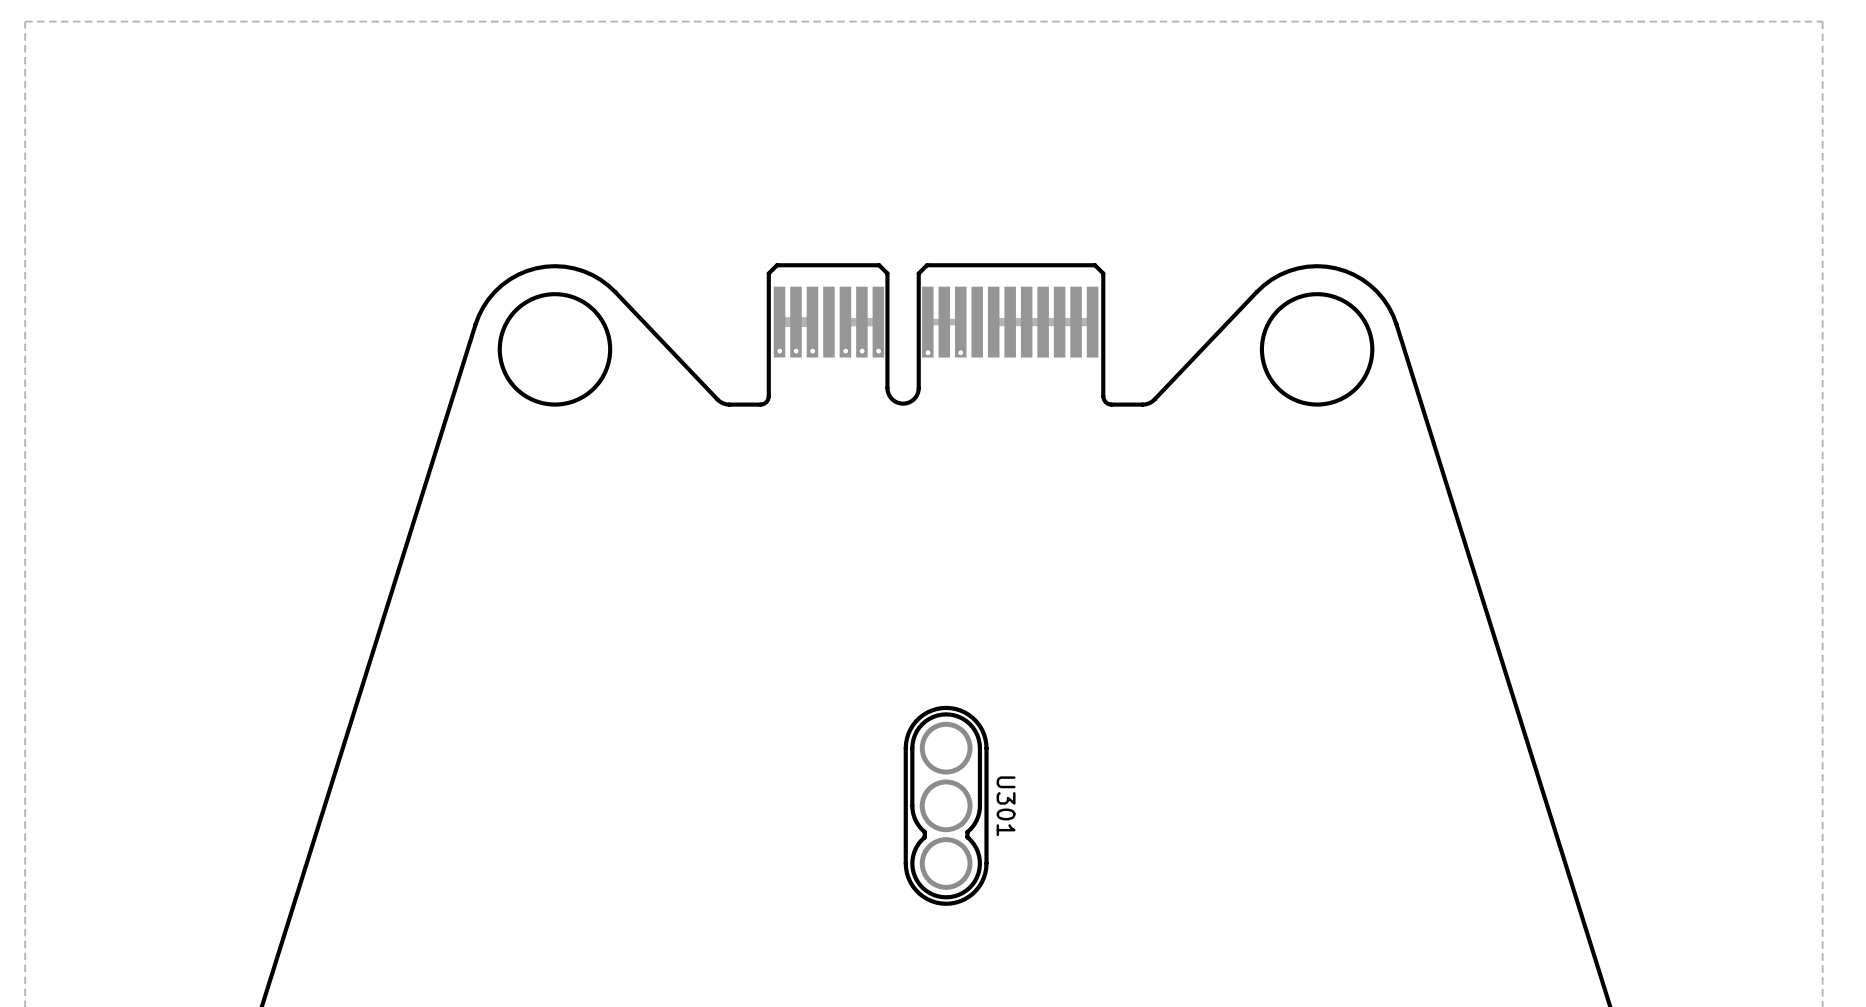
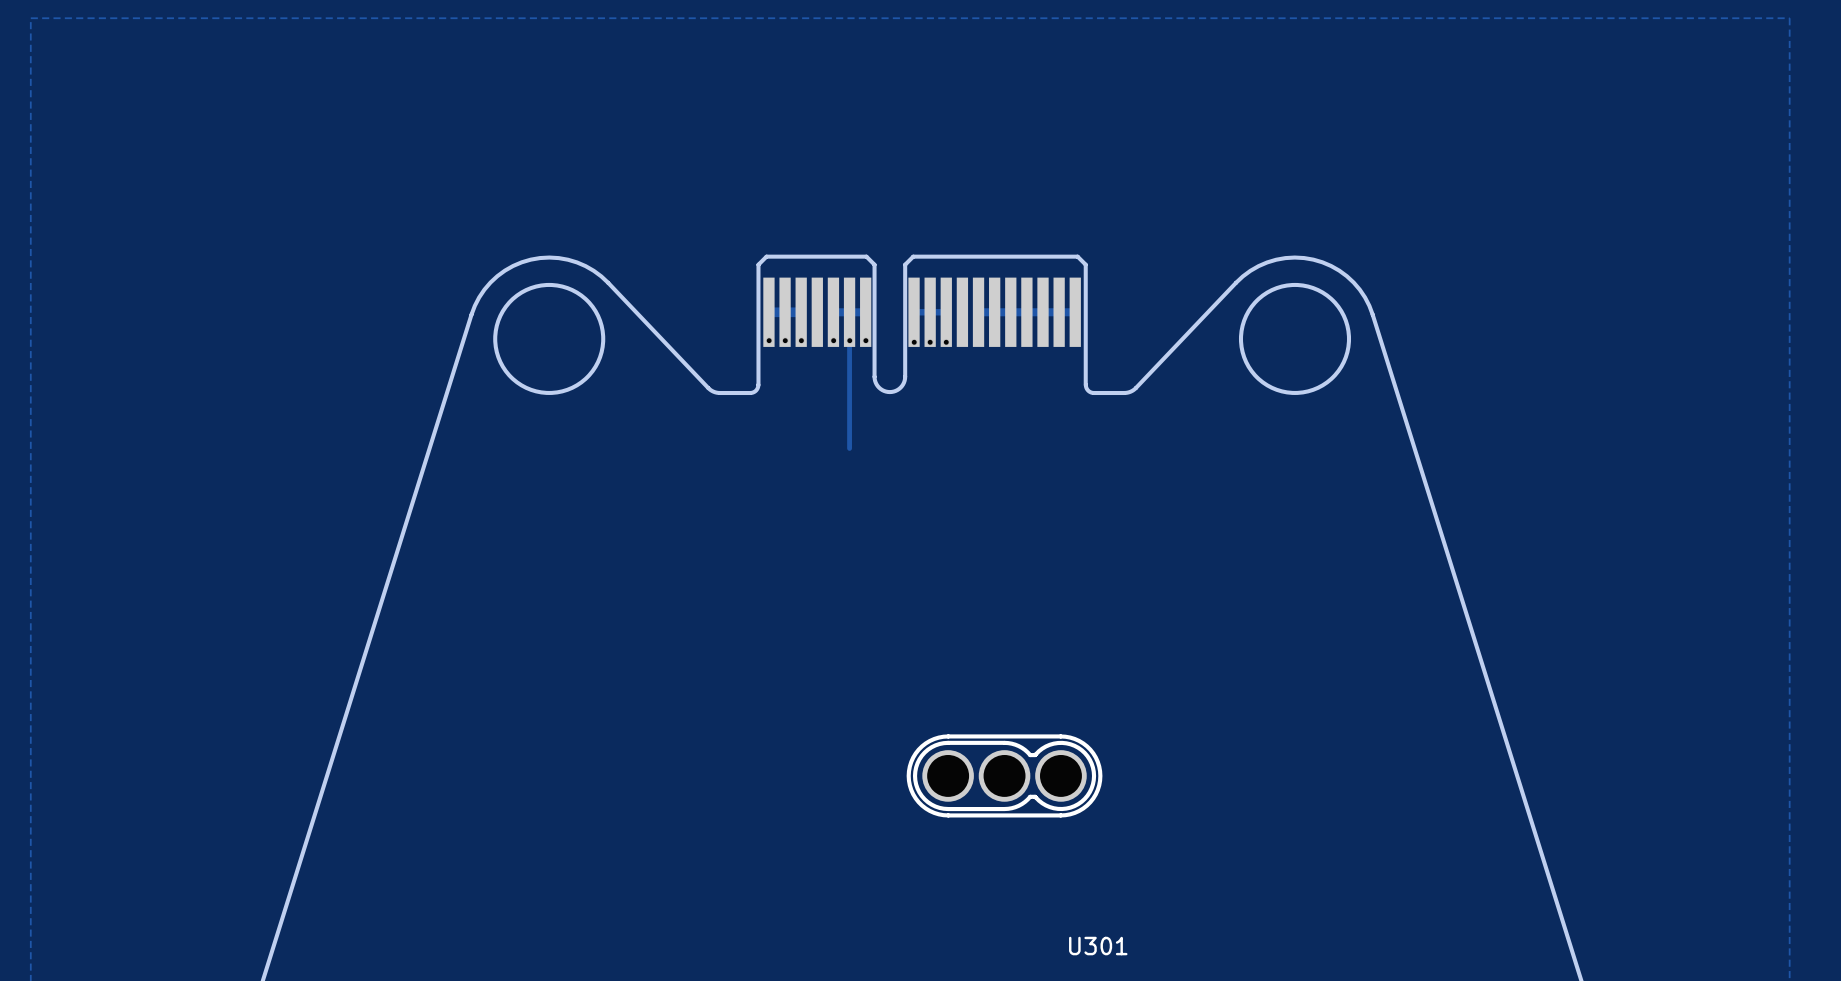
track: none -> (849, 312) (849, 448)
via: none -> (930, 342)
U301 rotation: 0° (946, 805) -> 90° counterclockwise (1004, 775)
U301 name position: U301 (1006, 806) -> U301 (1098, 946)

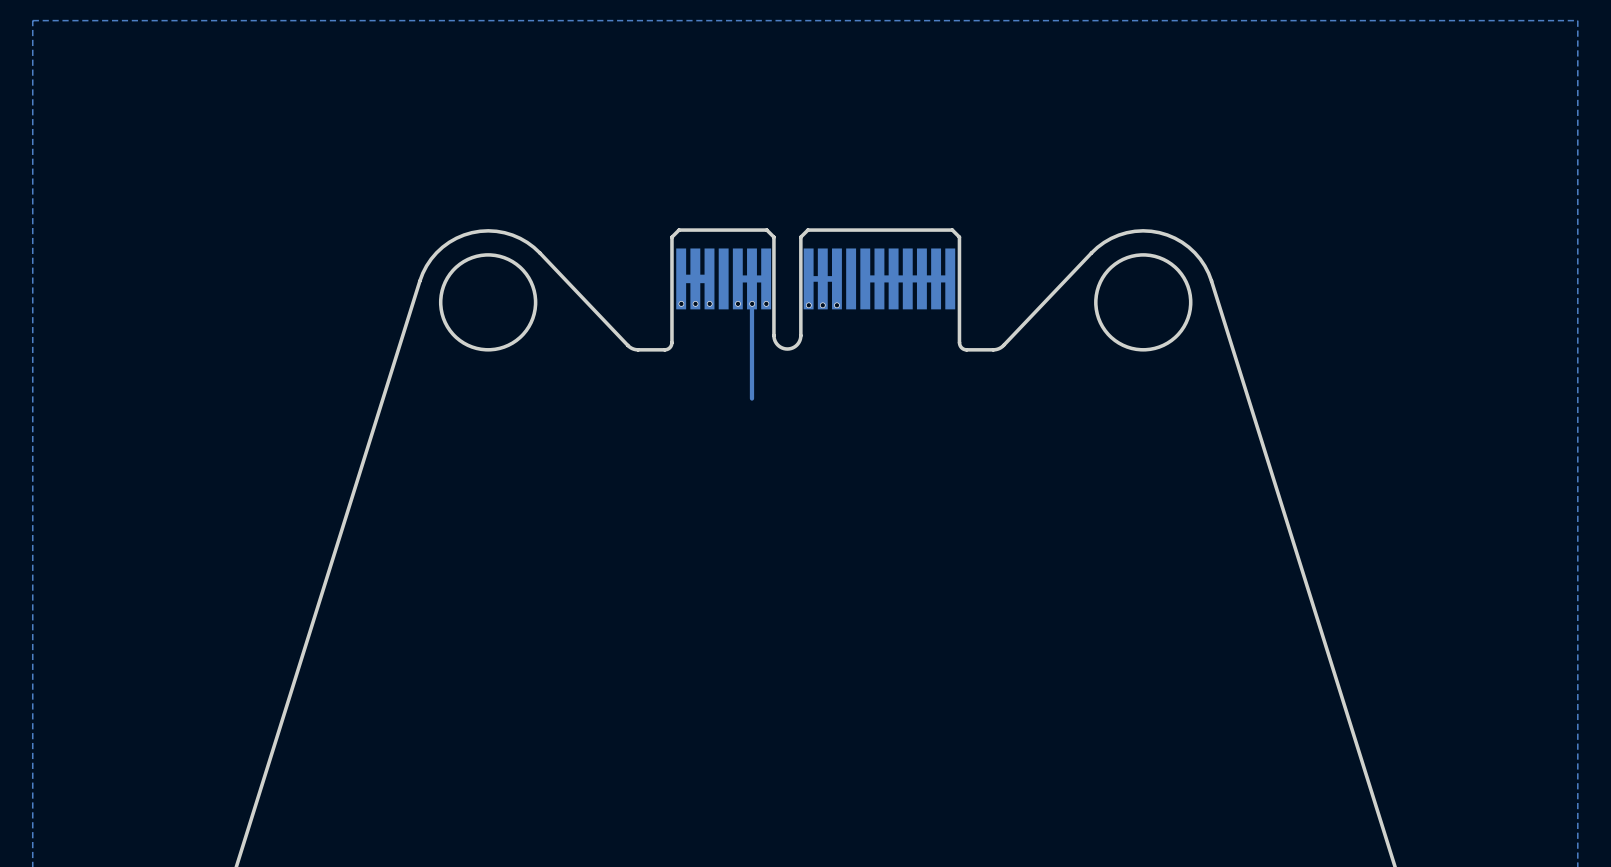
U301: (1004, 775) -> none

